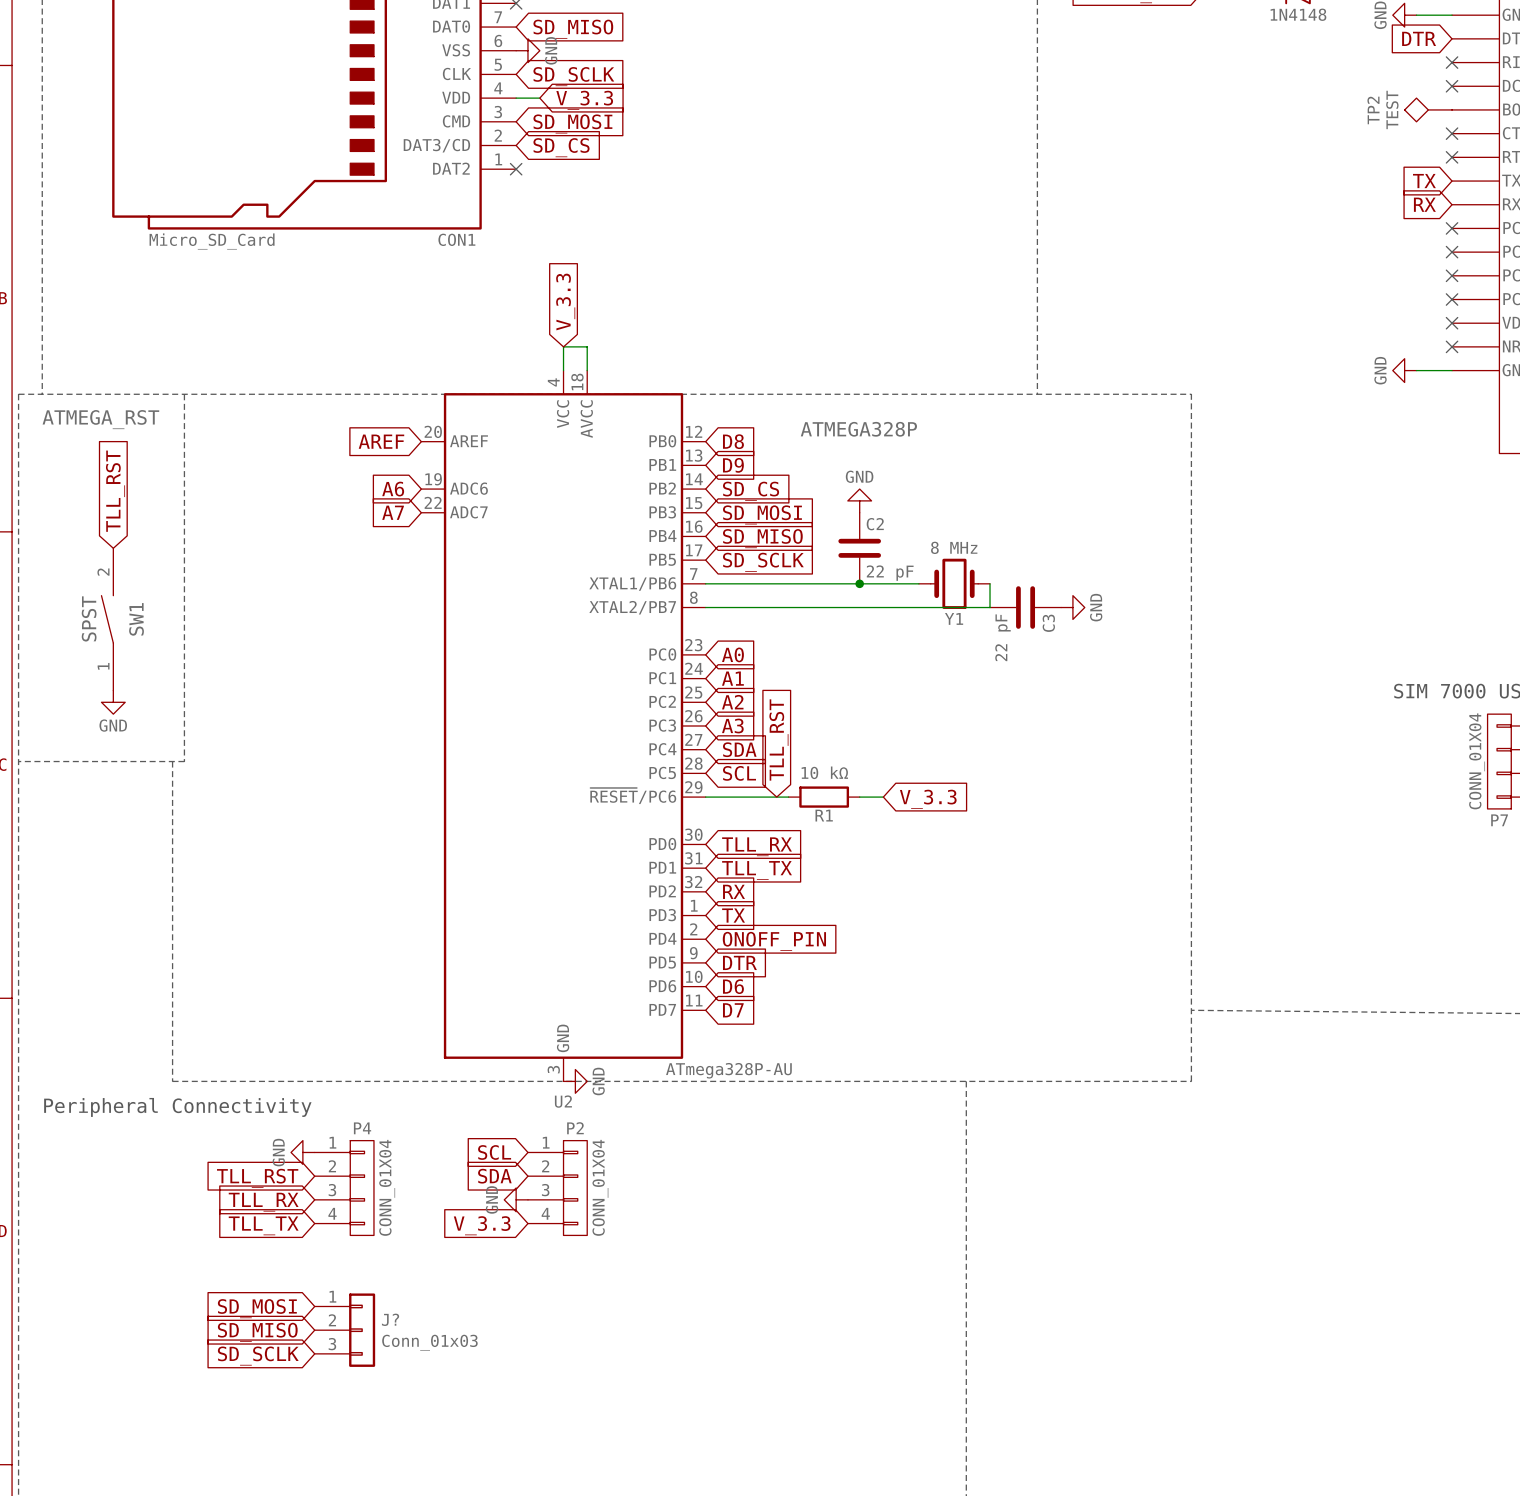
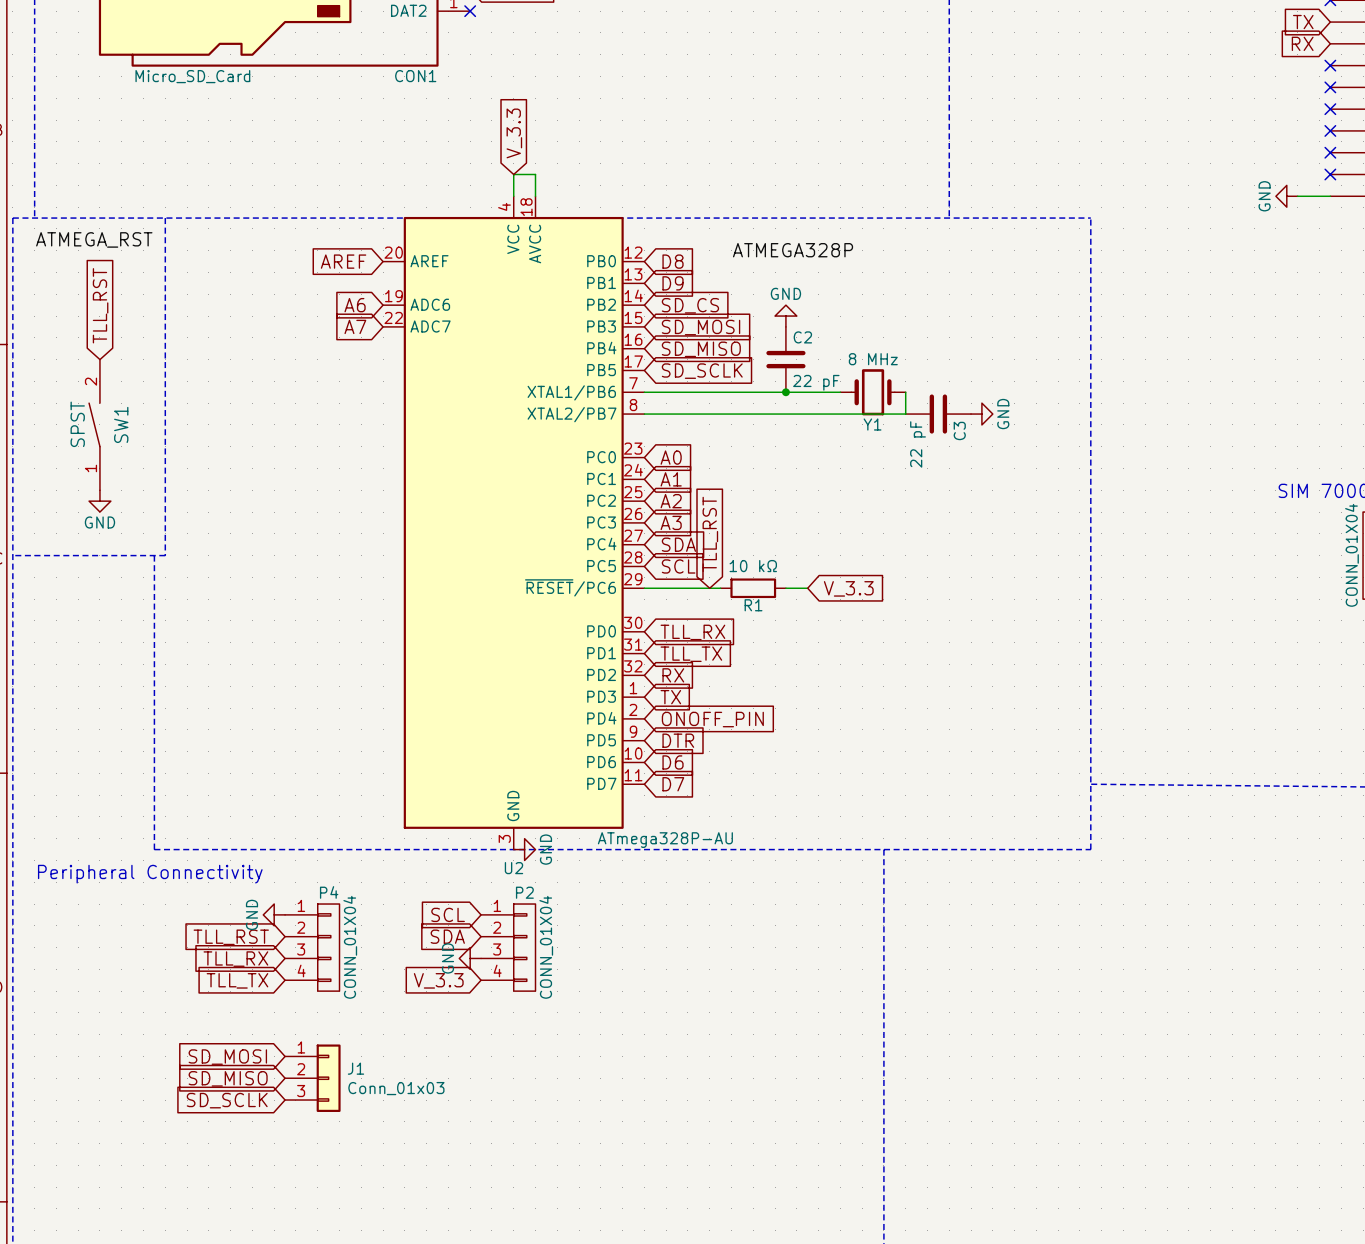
J? name: J? (390, 1319) -> J1 (355, 1068)

